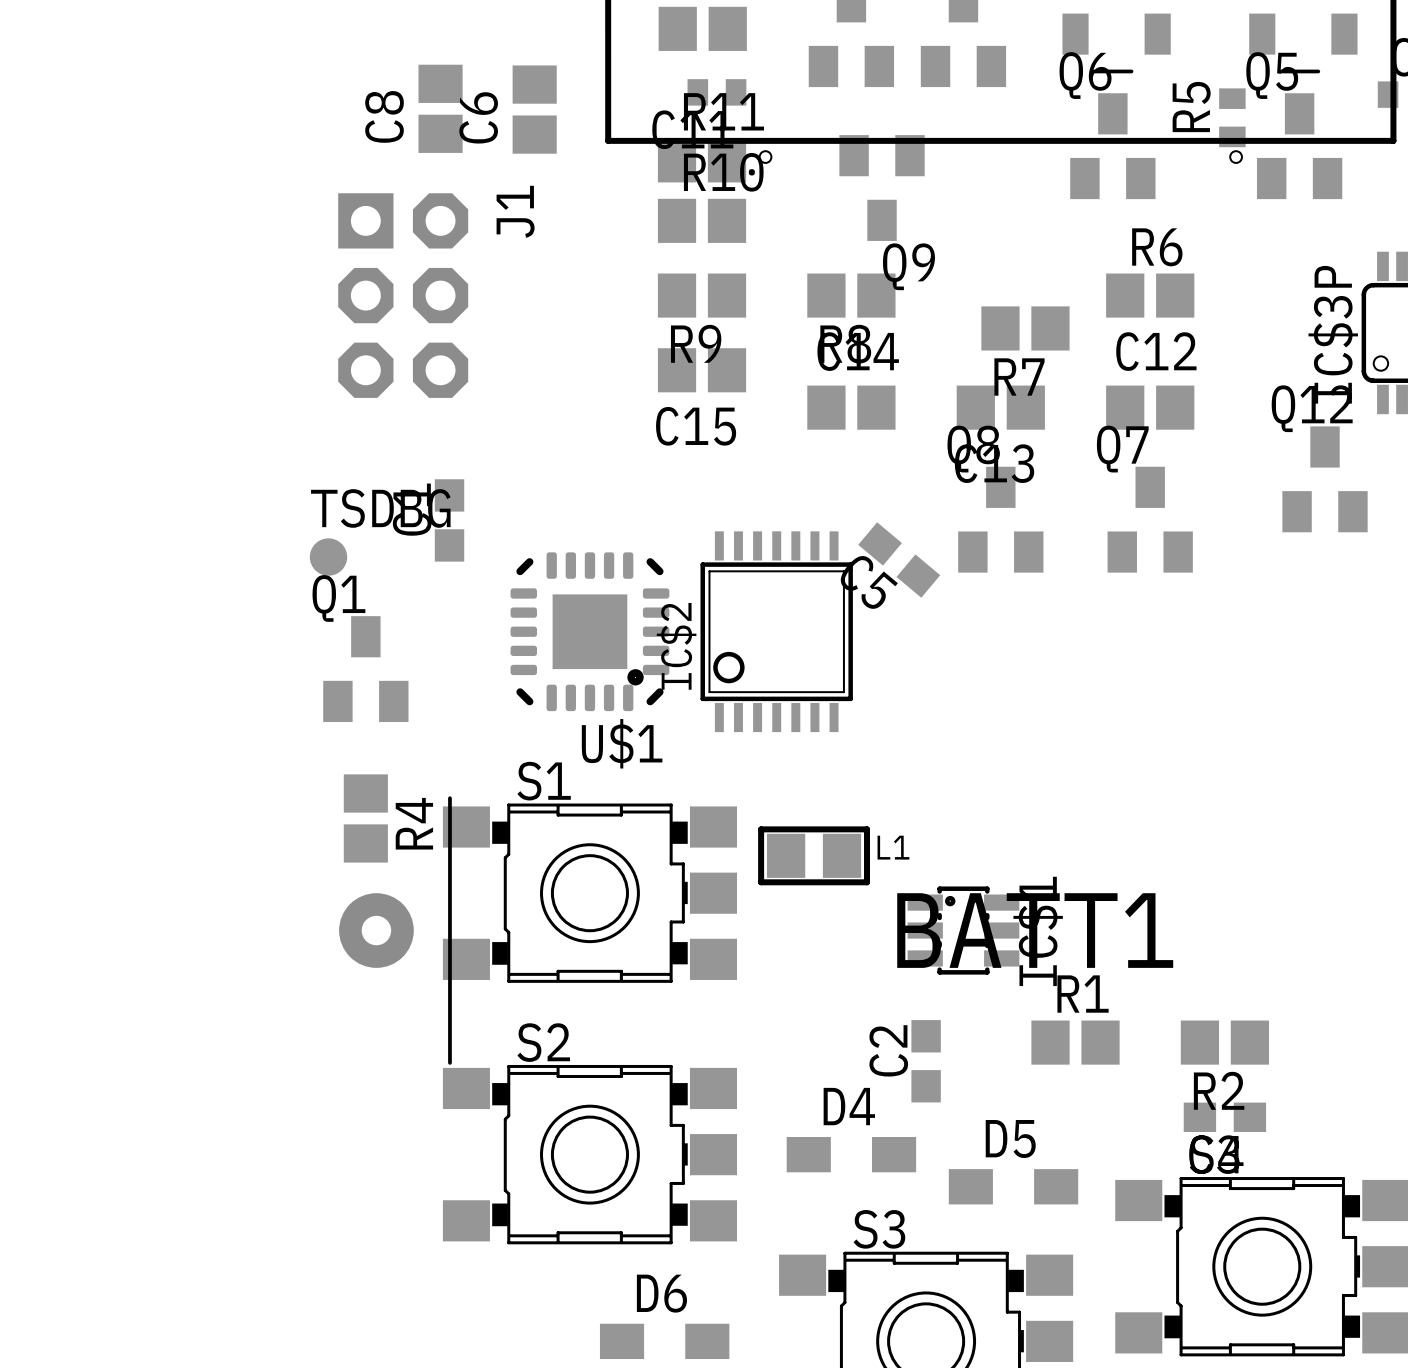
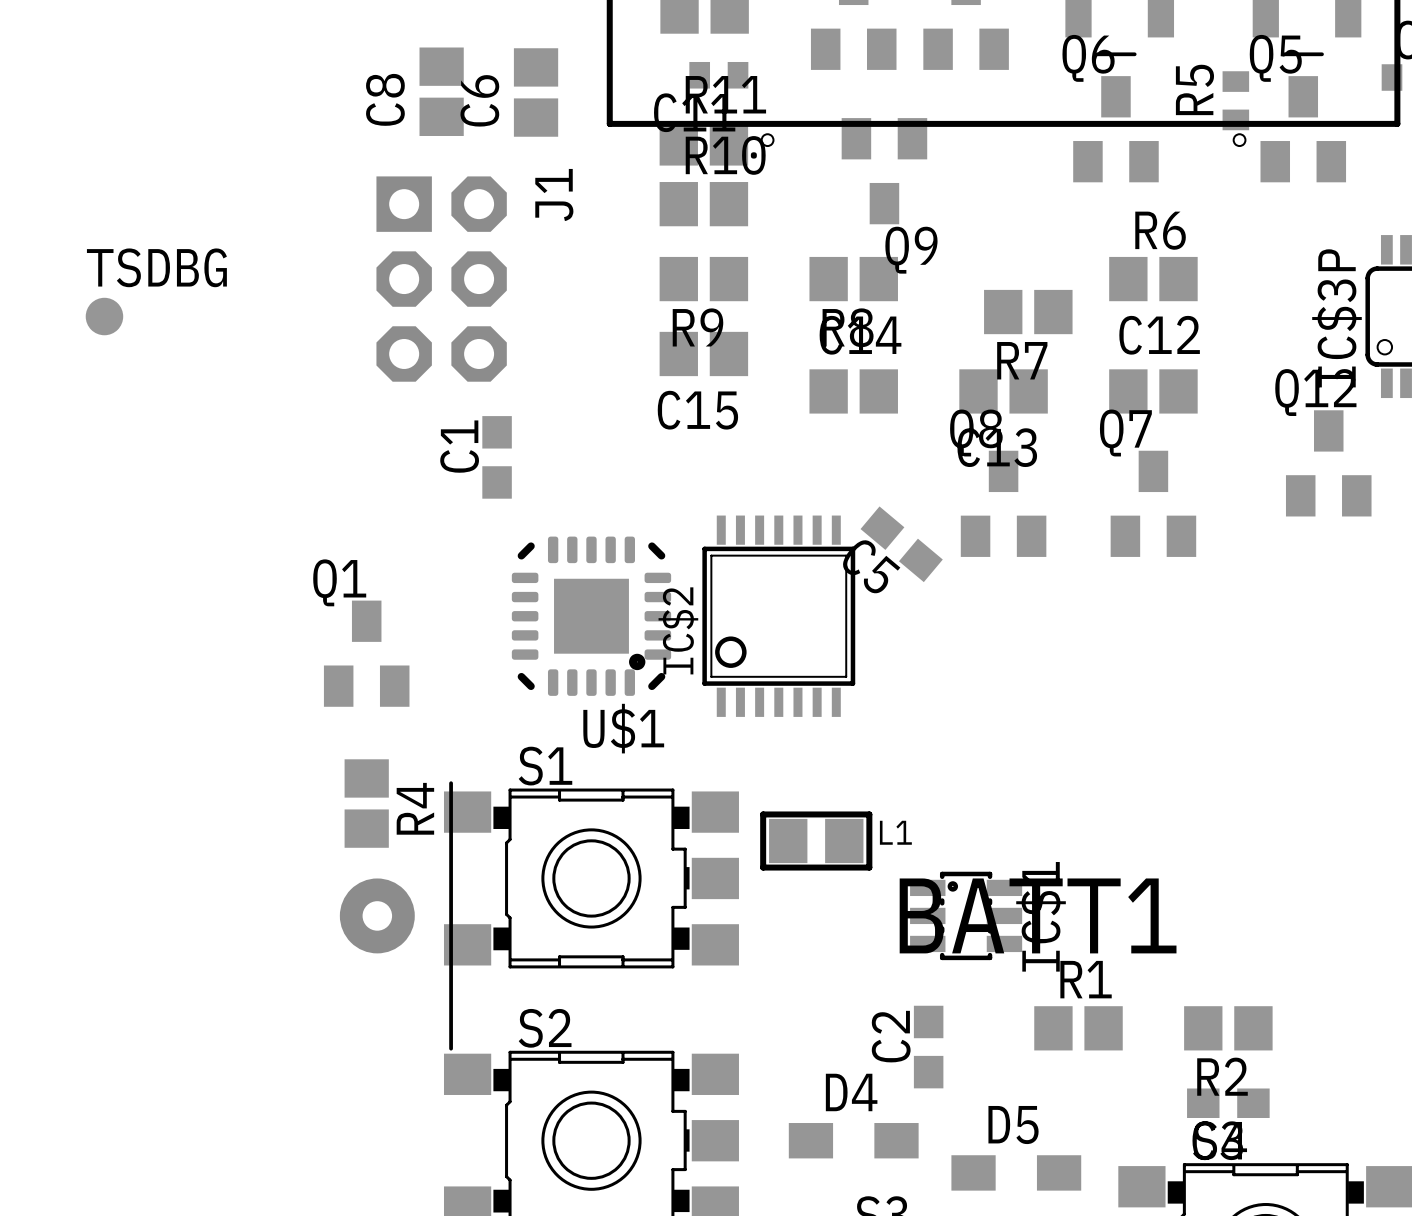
J1 position: (403, 295) -> (441, 279)
C1 position: (449, 520) -> (497, 457)
TSDBG position: (328, 557) -> (104, 316)

